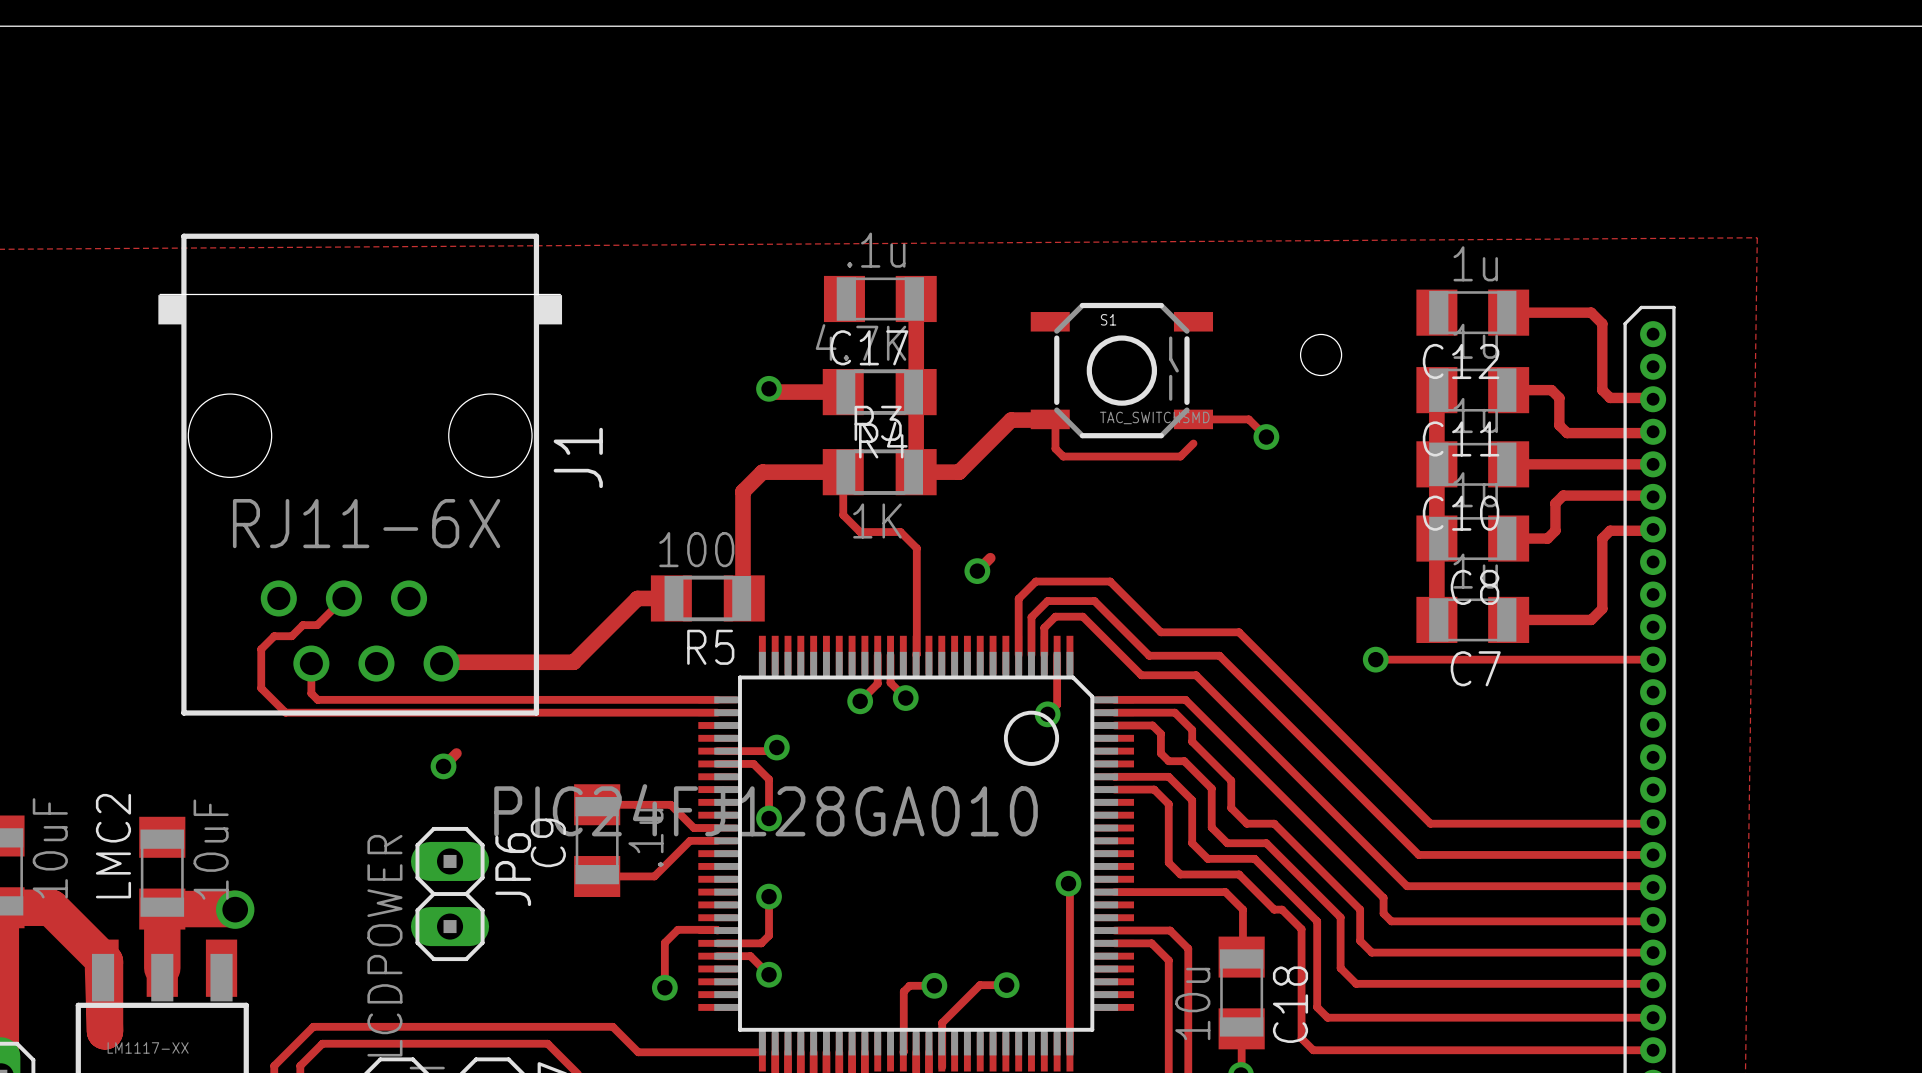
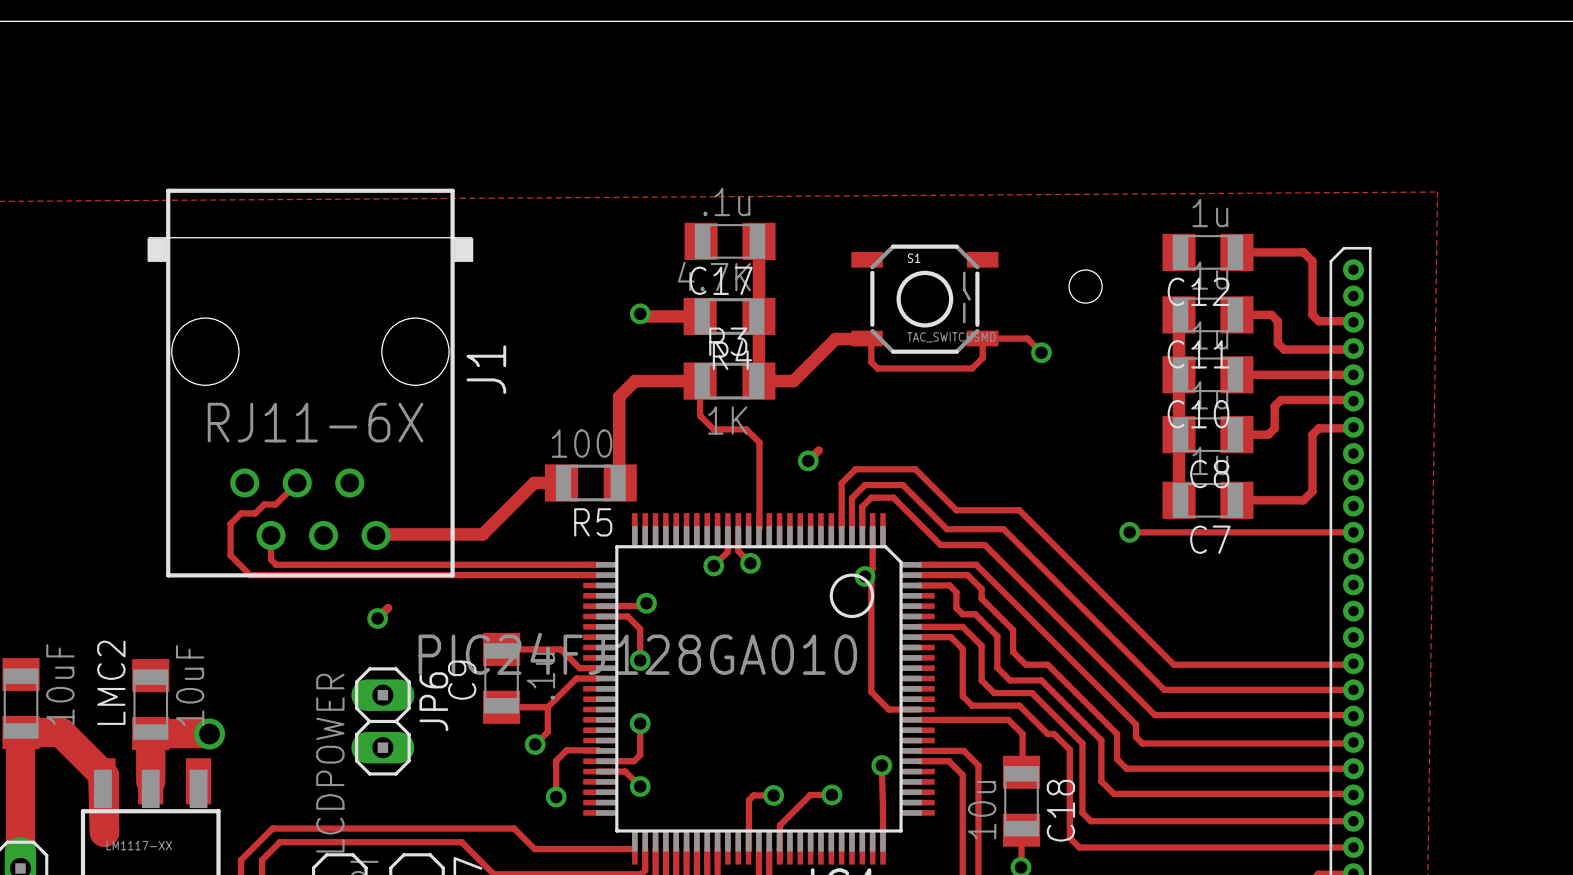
track: none -> (982, 338) (982, 357)
track: none -> (865, 576) (871, 582) (871, 692) (888, 709) (919, 709)
track: none -> (547, 707) (547, 731) (535, 744)
track: (1068, 883) (1069, 1002) -> (881, 765) (882, 808)
via position: (1068, 883) -> (881, 765)
via: none -> (535, 744)

